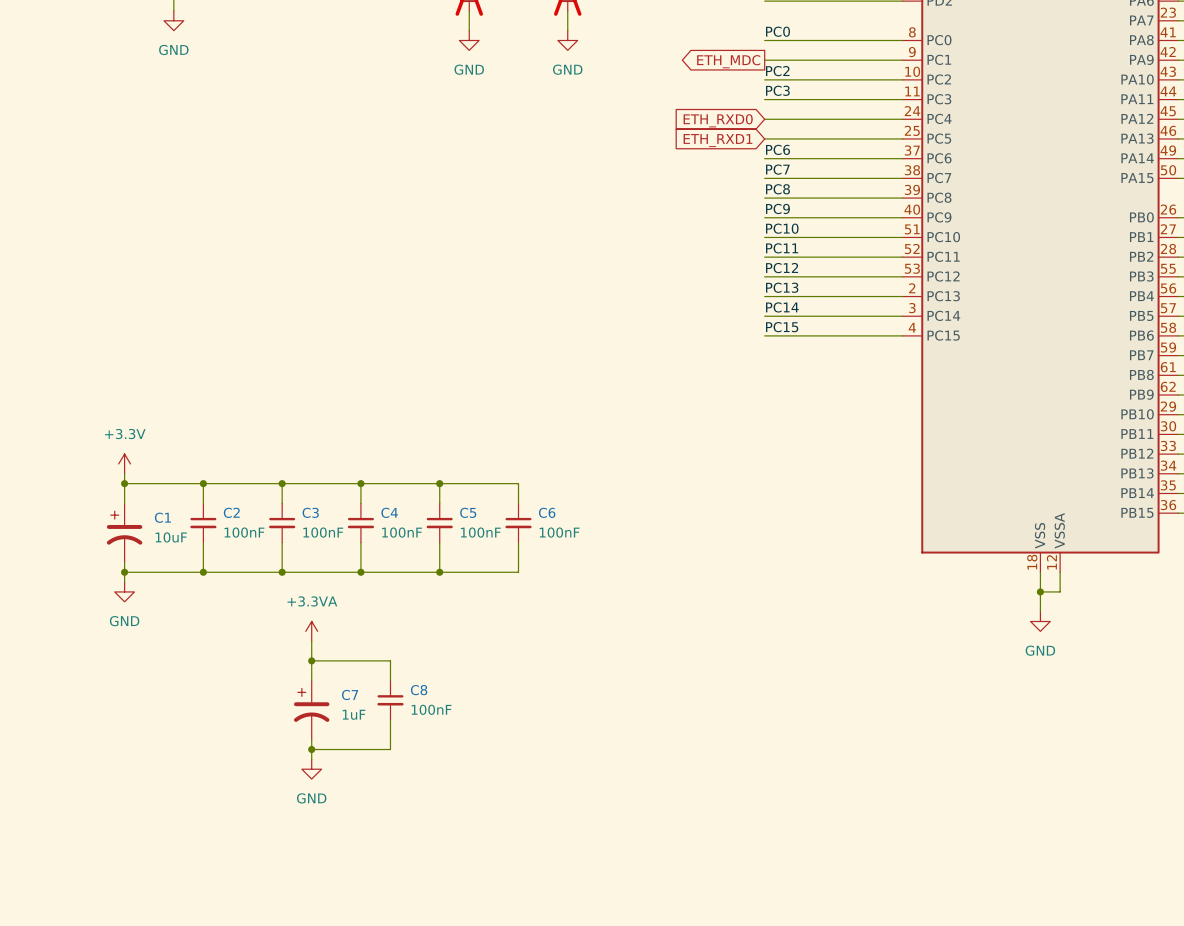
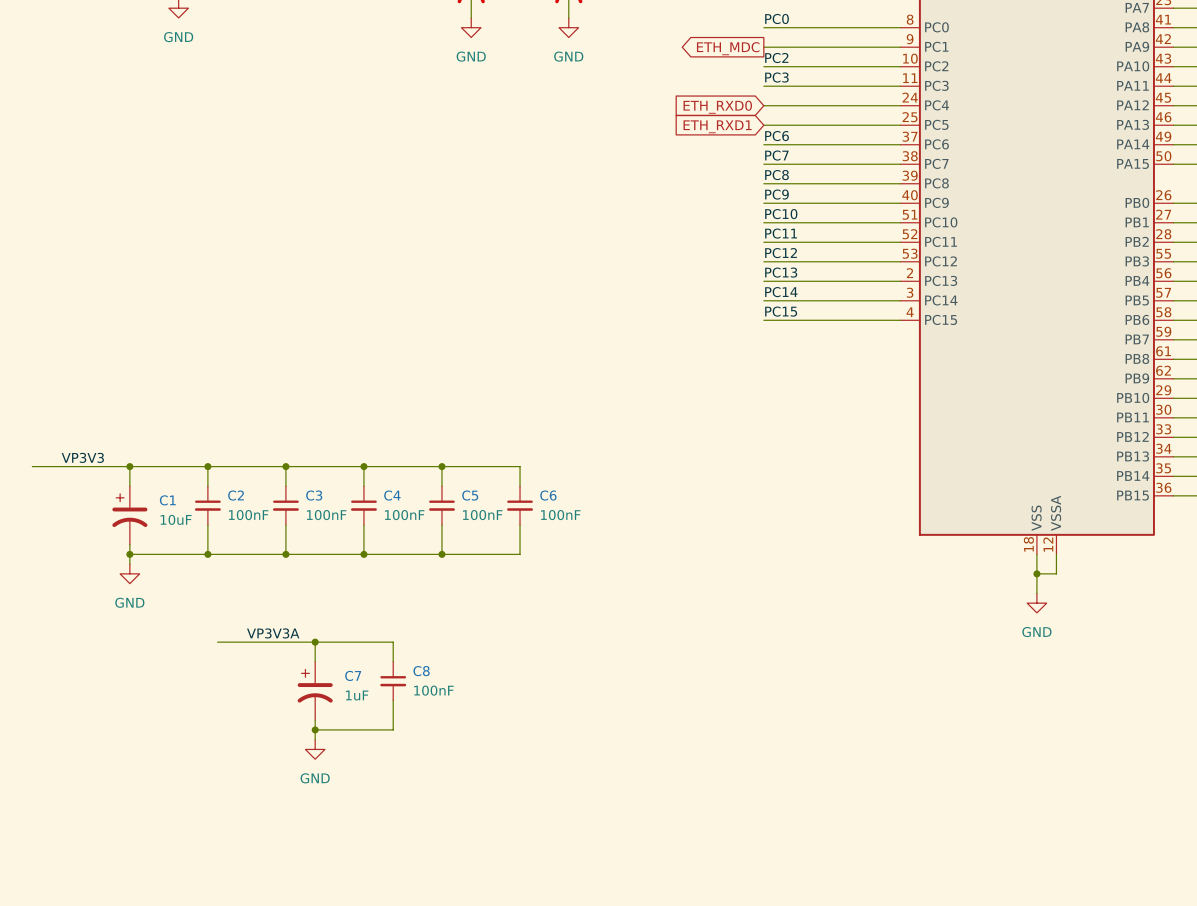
power symbol: +3.3V (124, 463) -> none
wire: (124, 473) (124, 483) -> (32, 466) (129, 466)
label: none -> VP3V3 (82, 457)
power symbol: +3.3VA (311, 631) -> none
wire: (311, 641) (311, 660) -> (217, 642) (315, 642)
label: none -> VP3V3A (273, 633)

